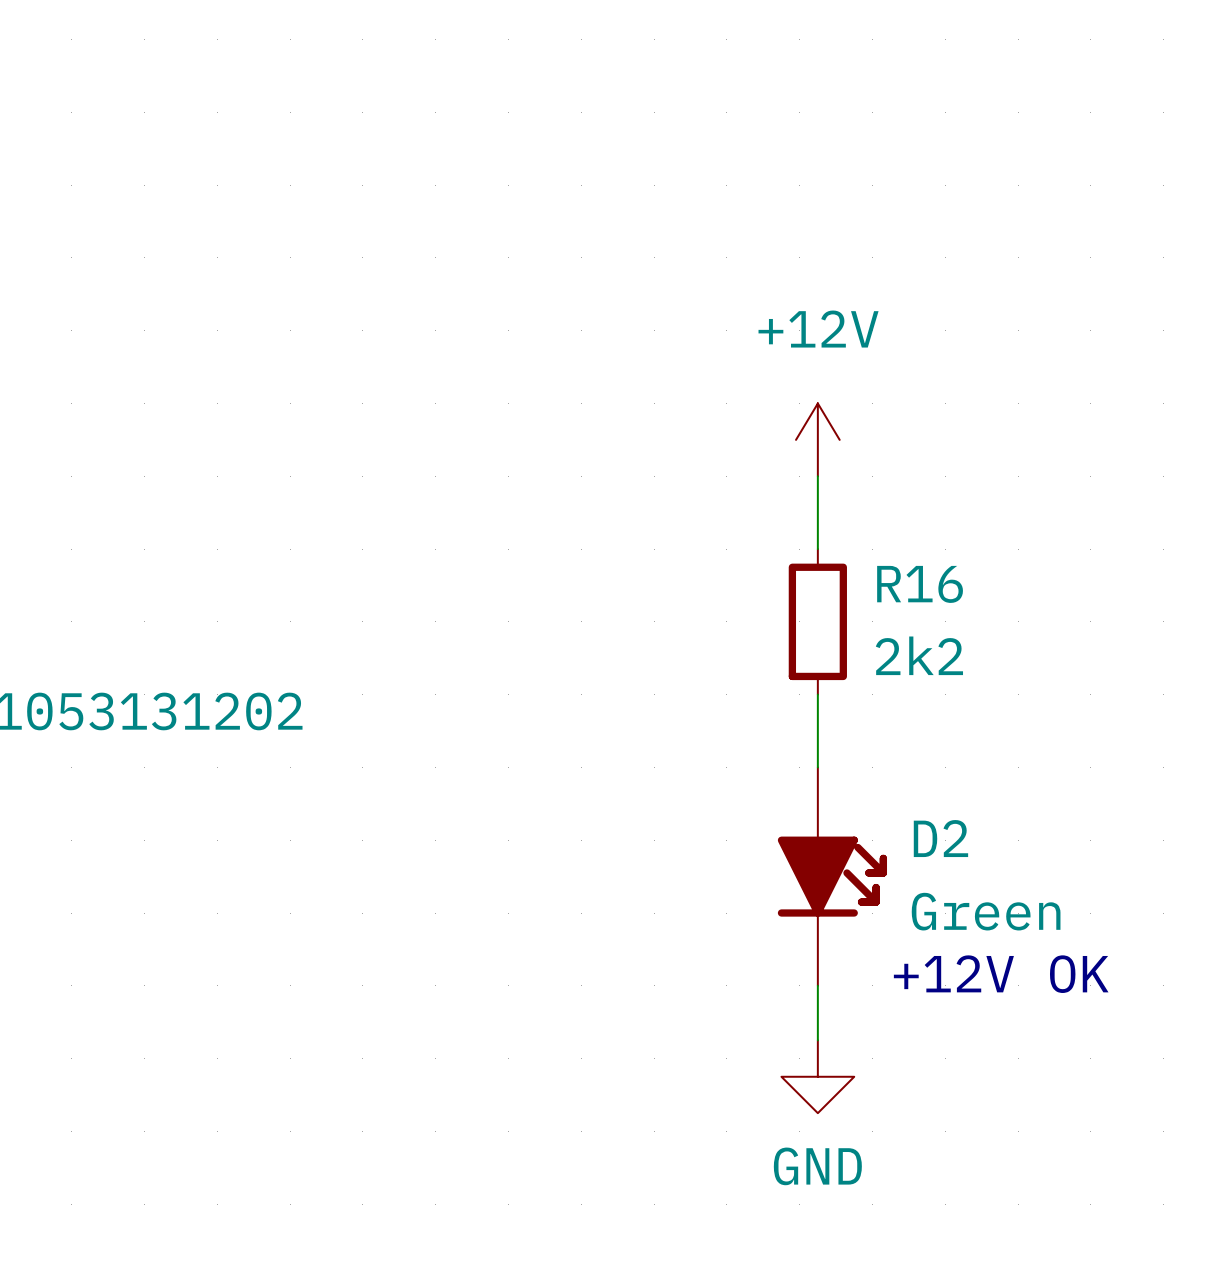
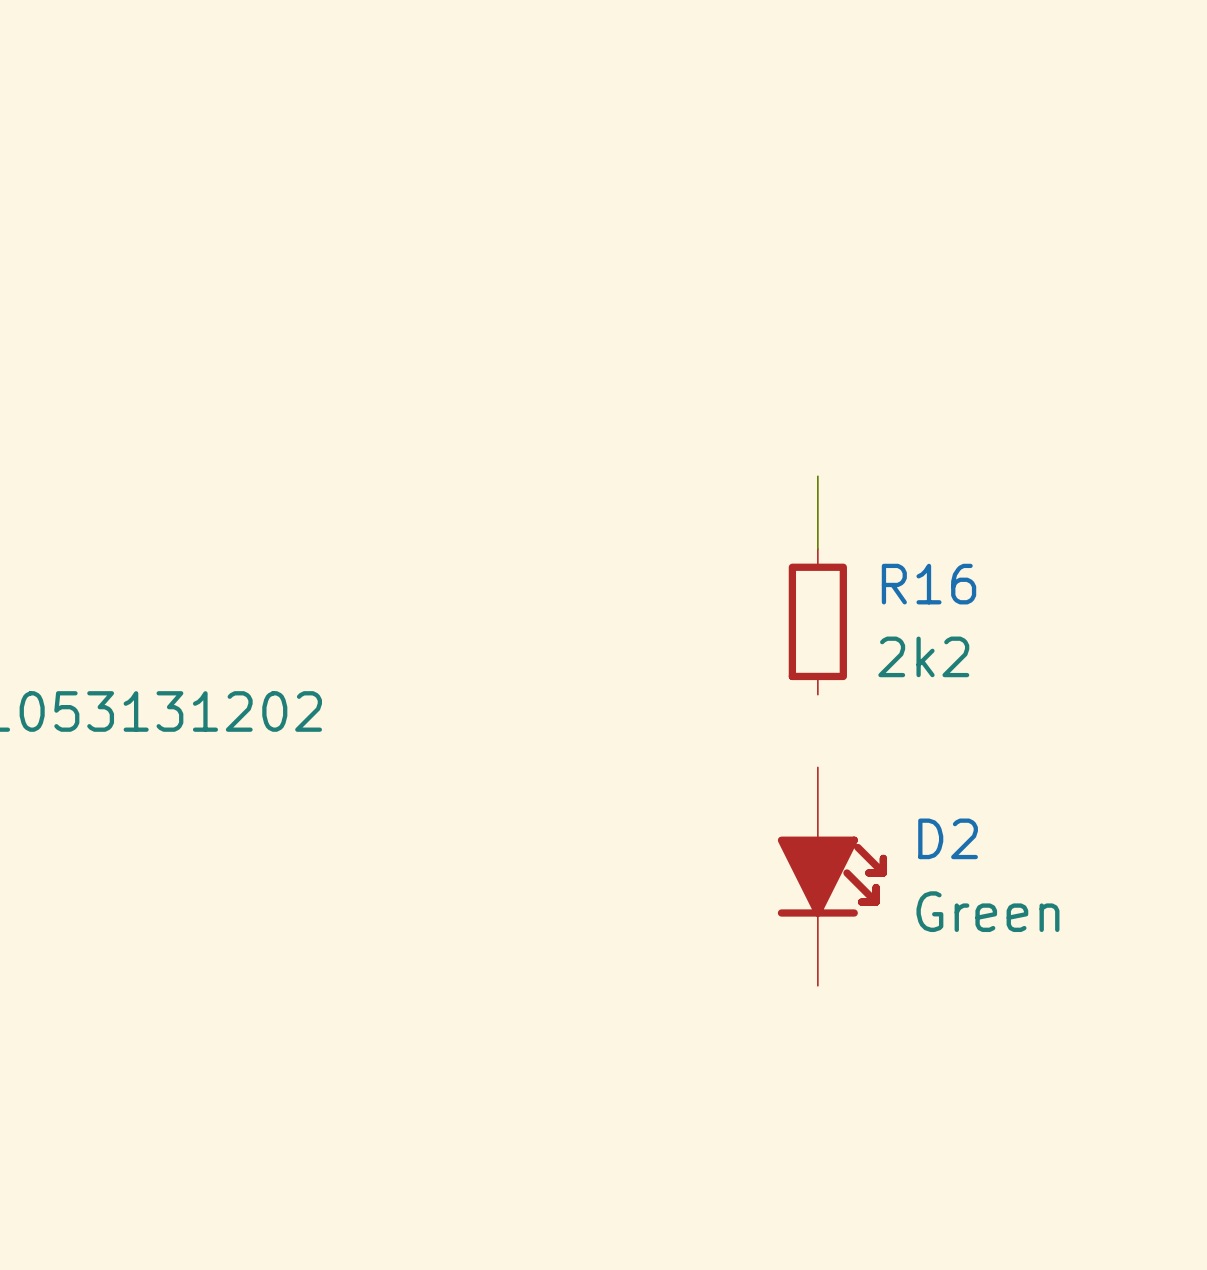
power symbol: +12V (817, 439) -> none
wire: (817, 694) (817, 767) -> none
text: +12V OK (1001, 974) -> none
wire: (817, 985) (817, 1040) -> none
power symbol: GND (817, 1076) -> none

